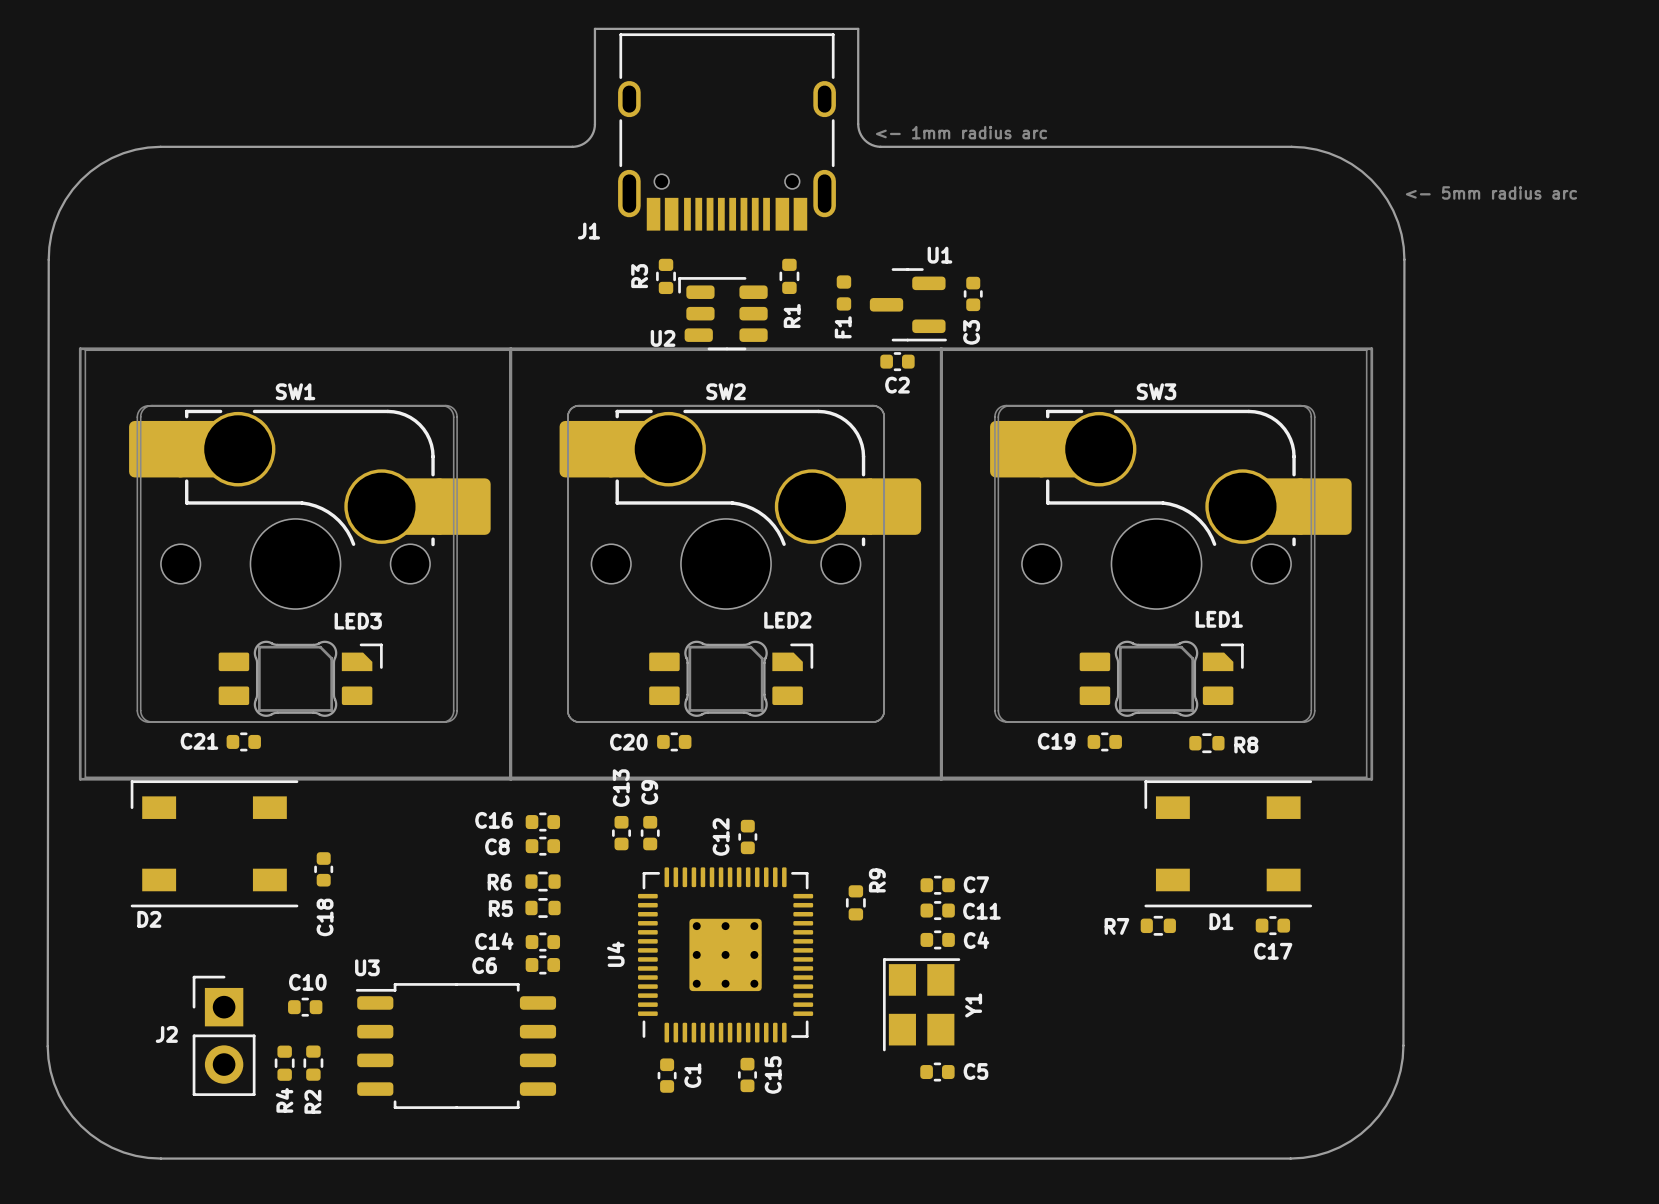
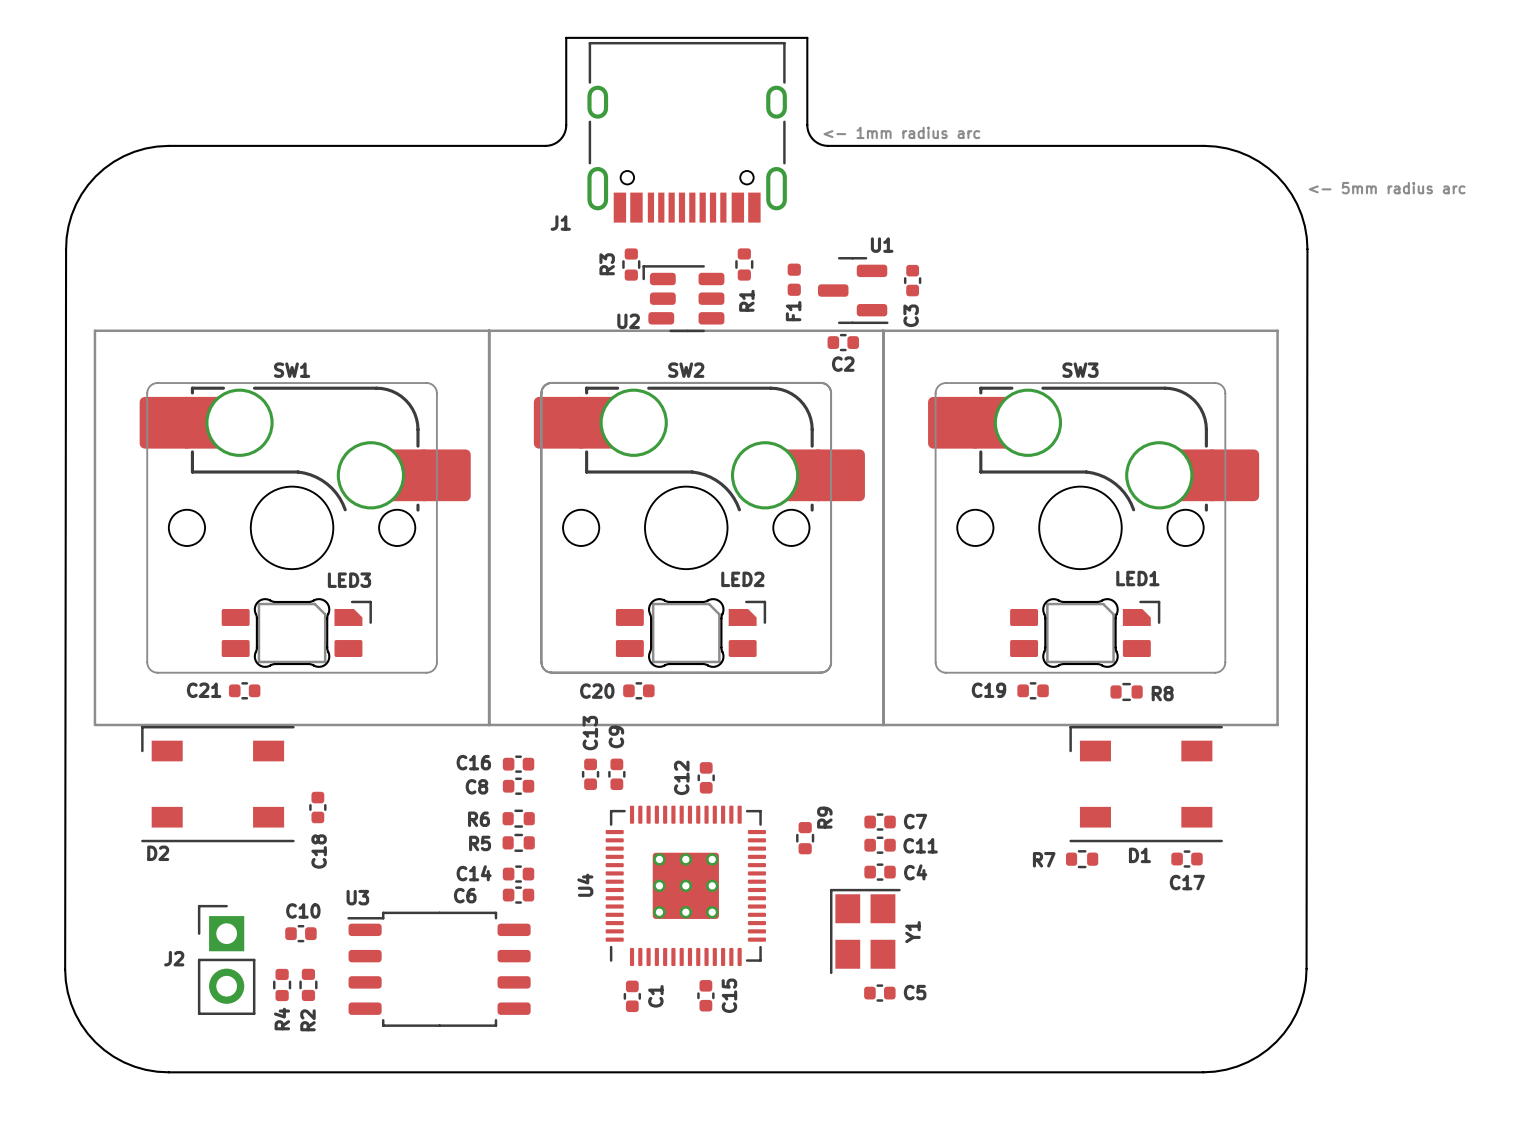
line: (85, 350) (85, 777) (1366, 777) (1366, 350) (85, 350) -> none
line: (152, 405) (445, 405) (453, 408) (457, 416) (457, 710) (453, 718) (445, 721) (152, 721) (144, 718) (140, 710) (140, 416) (144, 408) (152, 405) -> none
line: (1006, 405) (1300, 405) (1308, 408) (1311, 416) (1311, 710) (1308, 718) (1300, 721) (1006, 721) (998, 718) (994, 710) (994, 416) (998, 408) (1006, 405) -> none

